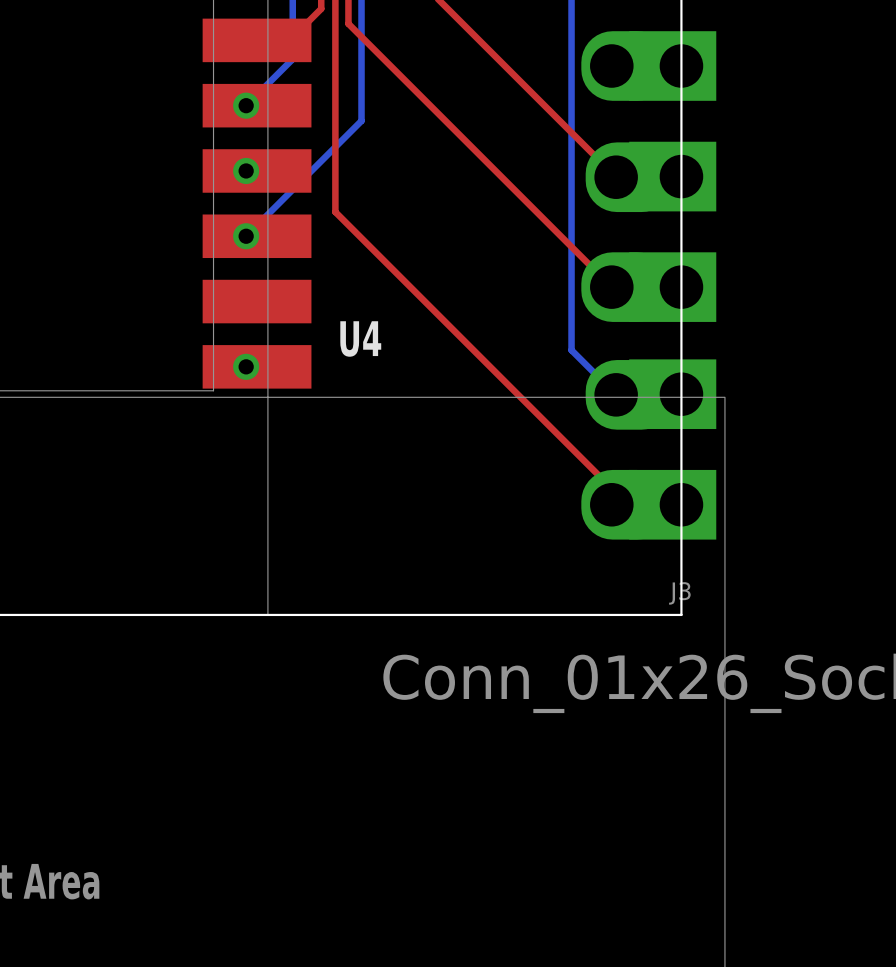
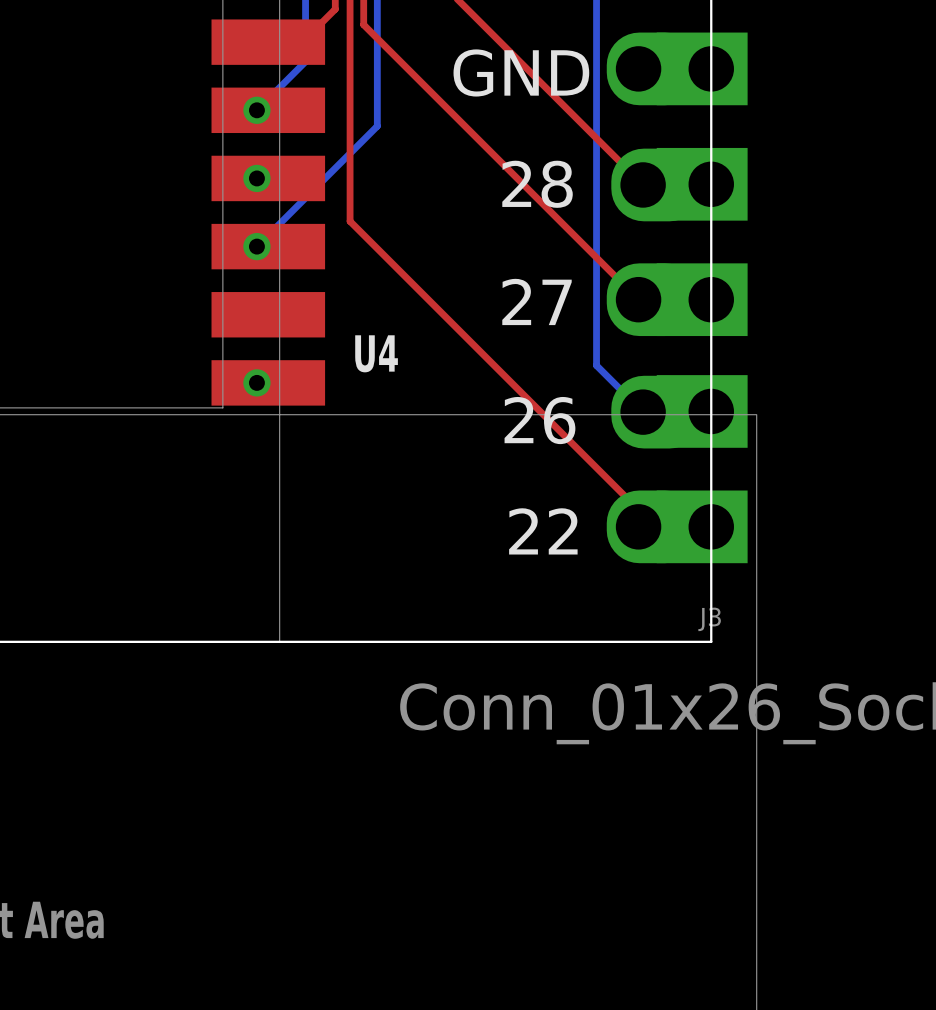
text: none -> GND (521, 72)
text: none -> 28 (537, 184)
text: none -> 27 (536, 301)
text: none -> 26 (539, 420)
text: none -> 22 (543, 531)

